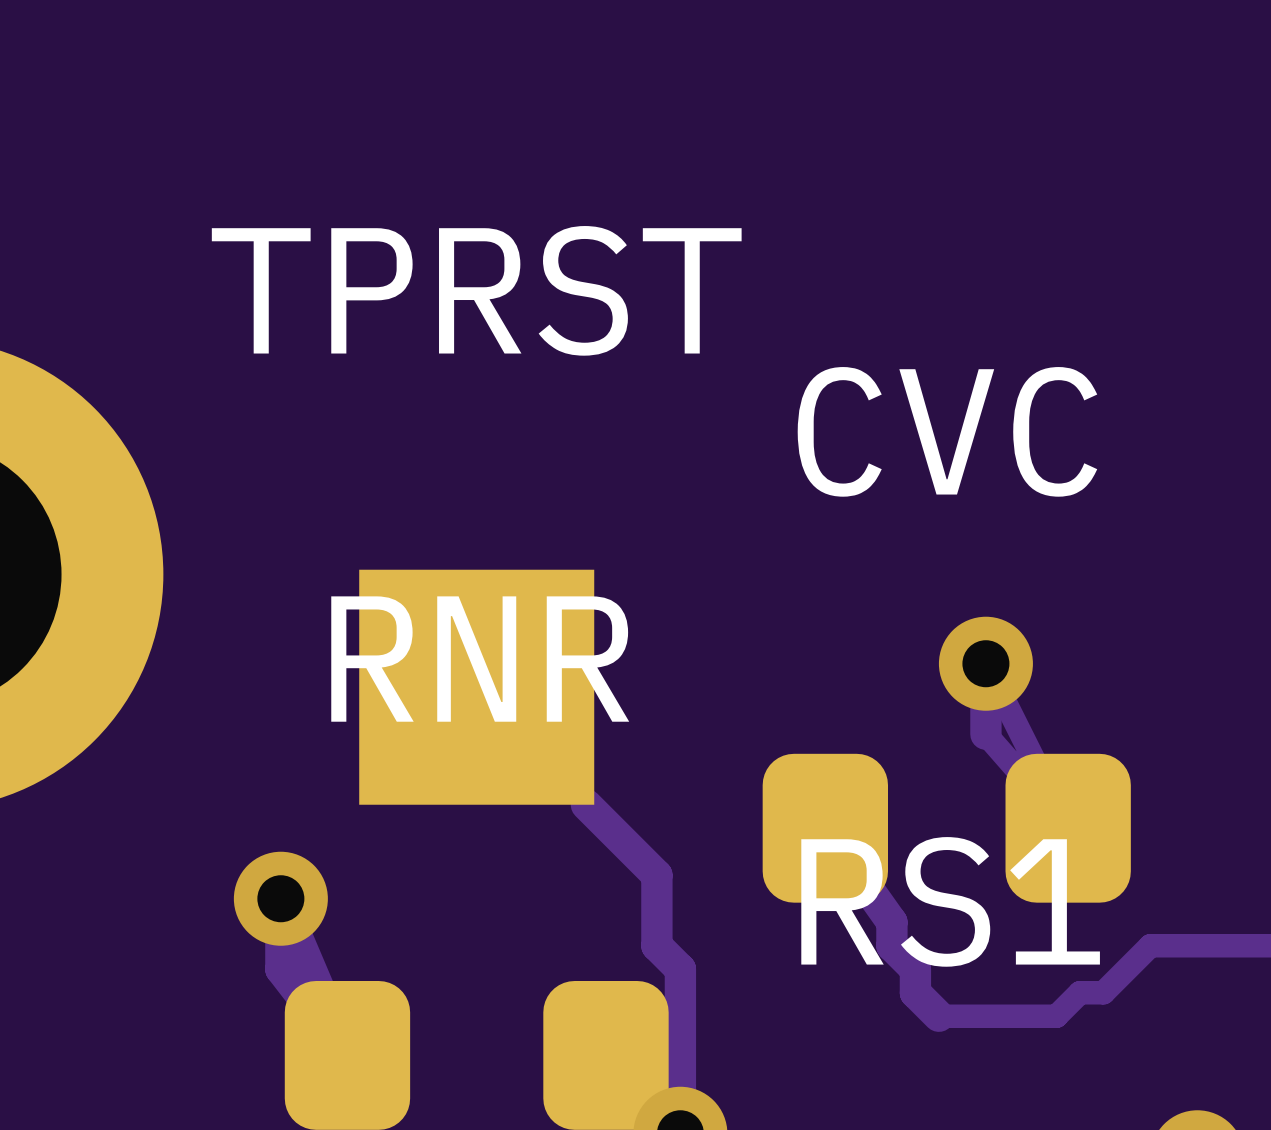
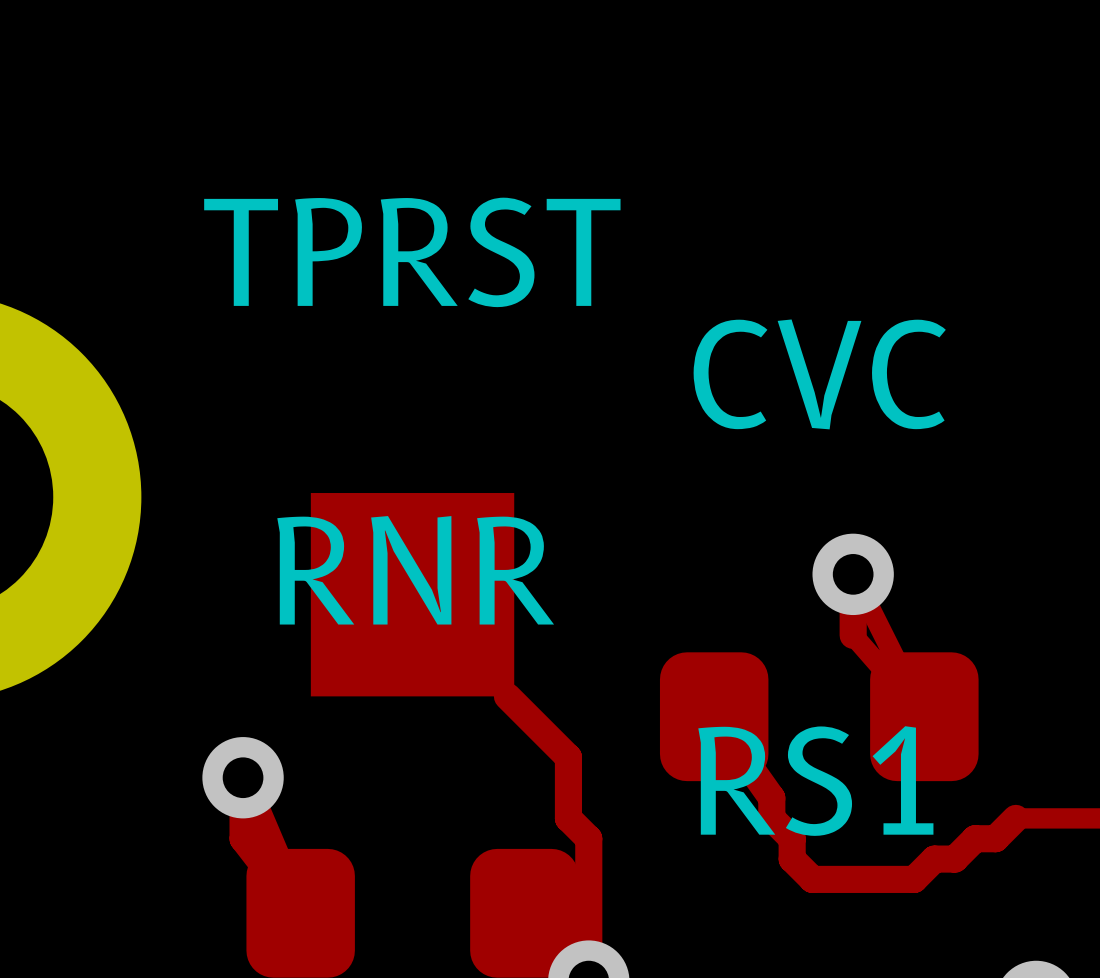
track: (1173, 945) (1150, 945) (1126, 969) -> (1015, 818) (995, 838) (975, 838)
track width: thin (1126, 969) (1103, 992) (1079, 992) (1056, 1016) (938, 1016) -> thick (975, 838) (954, 859) (934, 859) (914, 879) (812, 879)

